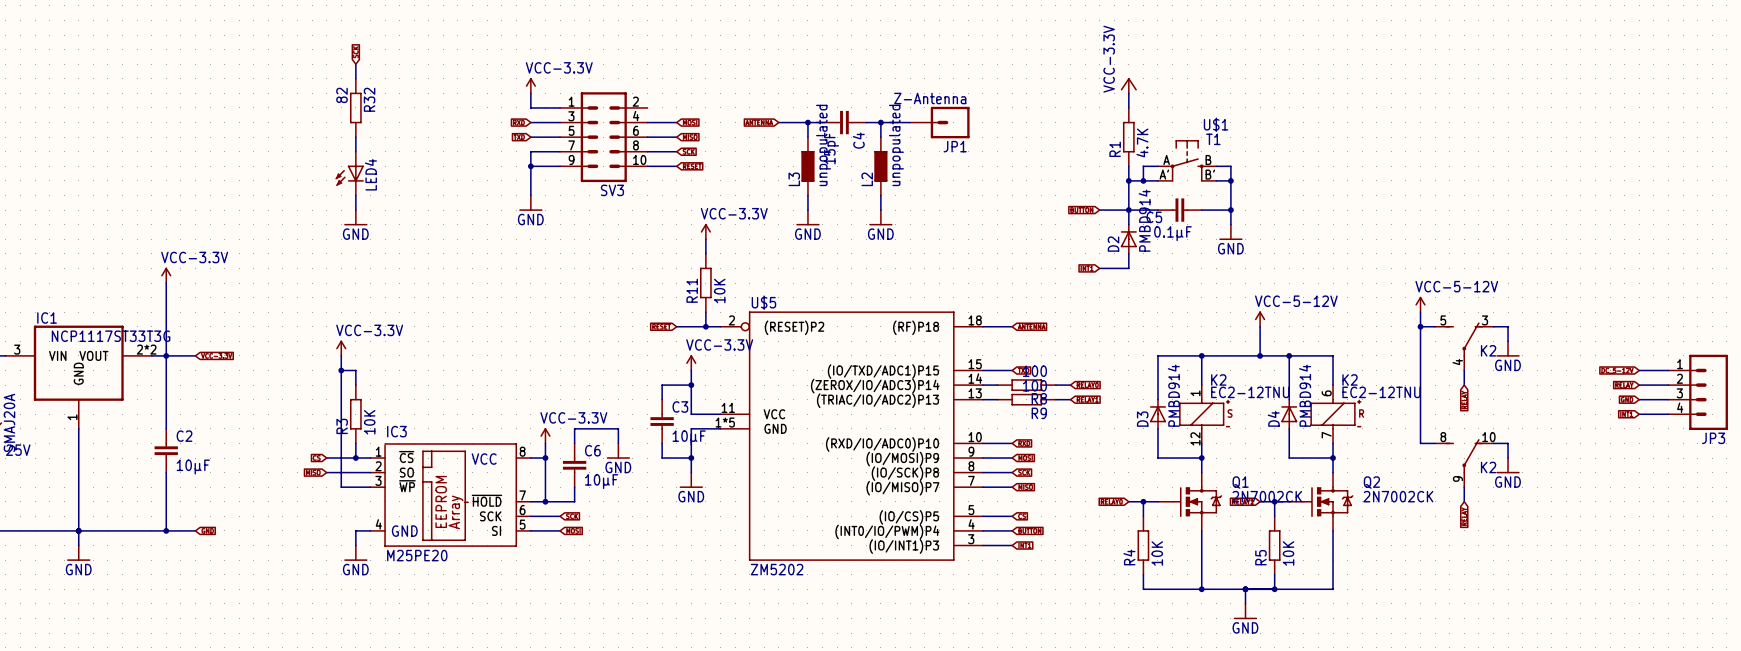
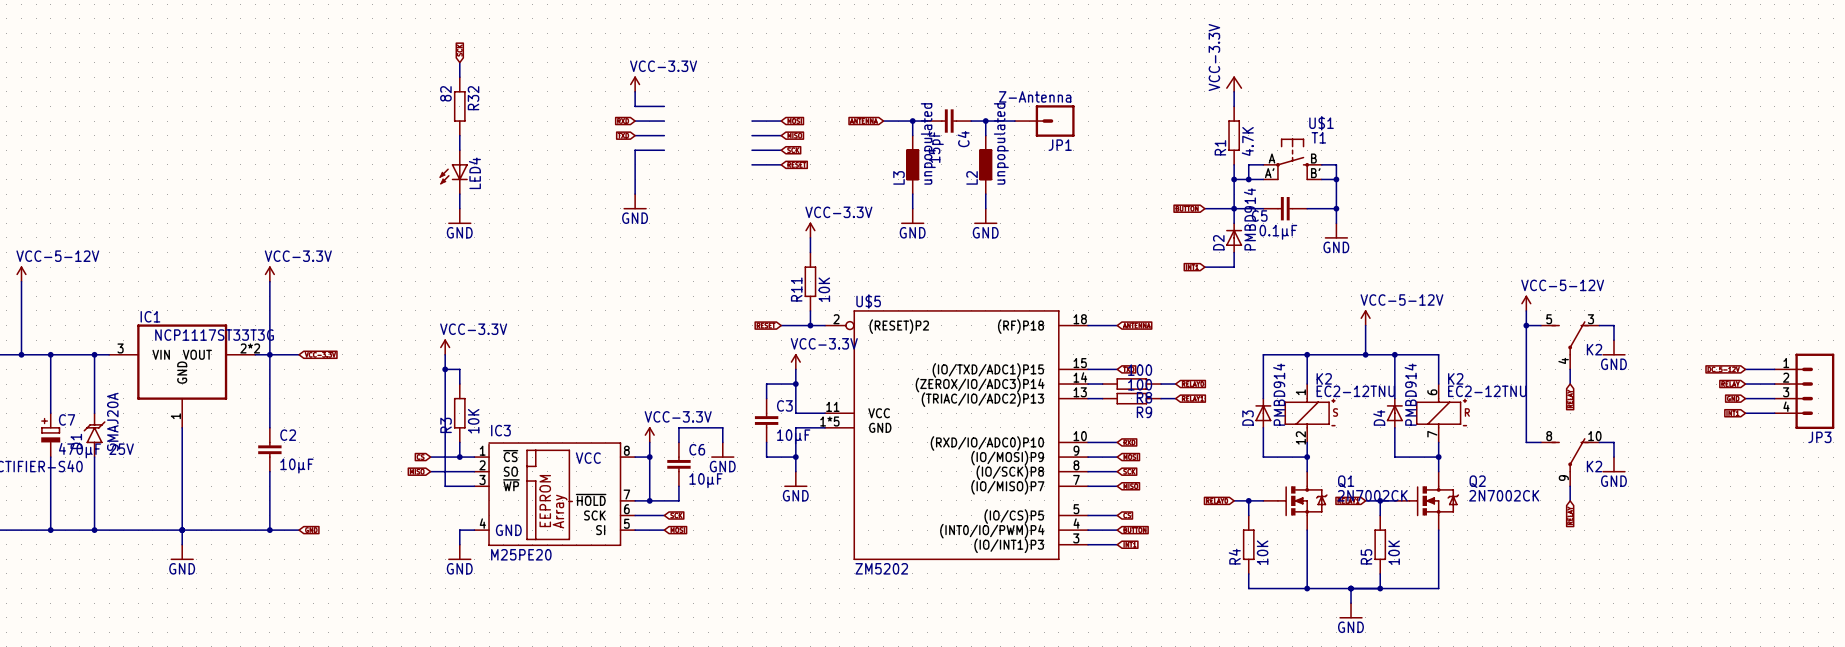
SV3: (603, 137) -> none
wire: (530, 166) (560, 166) -> none
junction: (530, 166) -> none

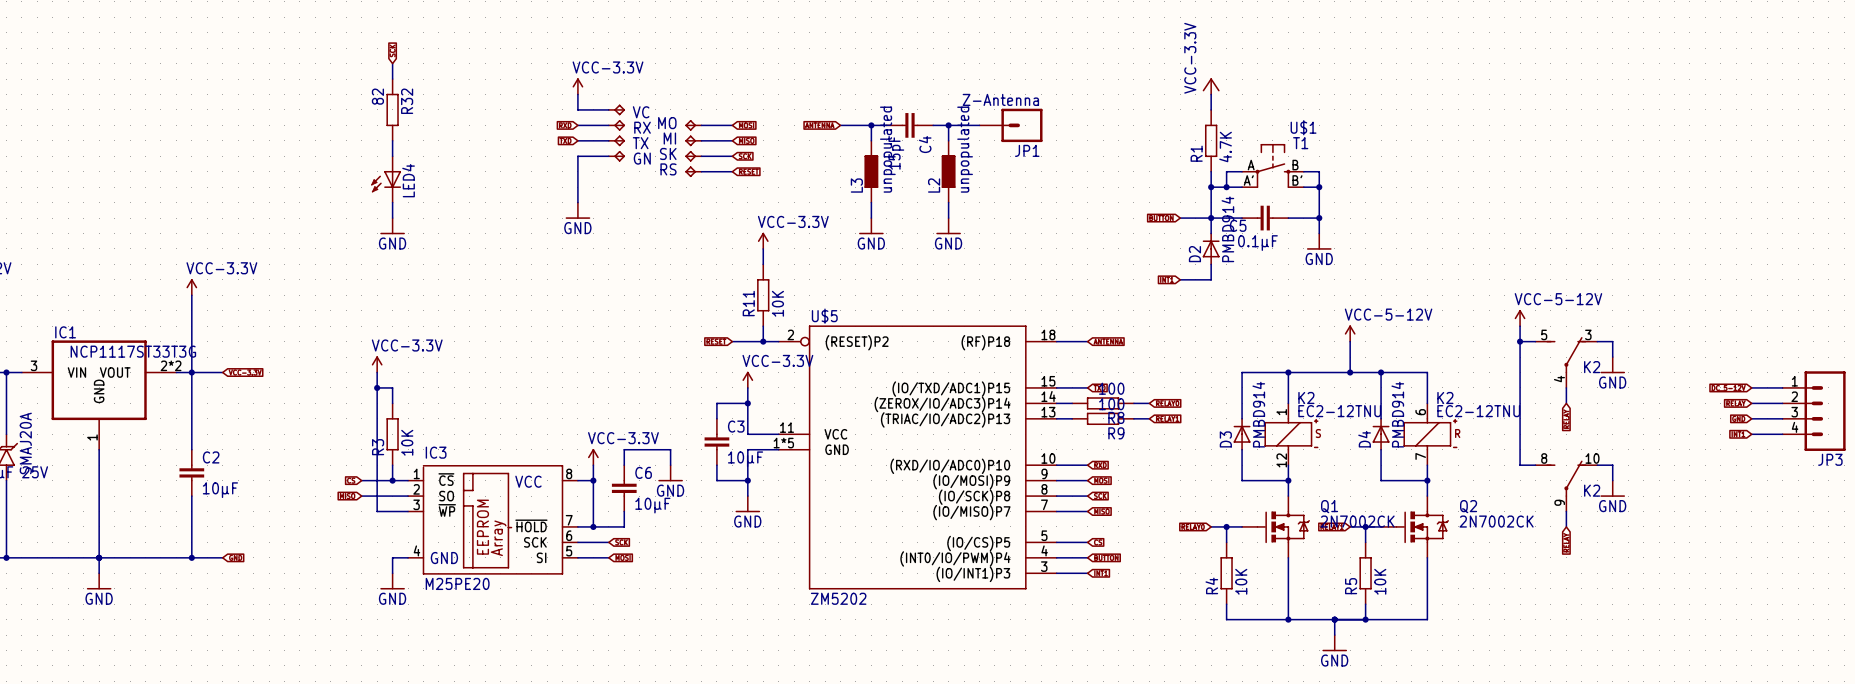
VC: none -> (616, 109)
RX: none -> (616, 125)
MO: none -> (693, 125)
TX: none -> (616, 140)
MI: none -> (693, 140)
GN: none -> (616, 156)
SK: none -> (693, 156)
RS: none -> (693, 171)

